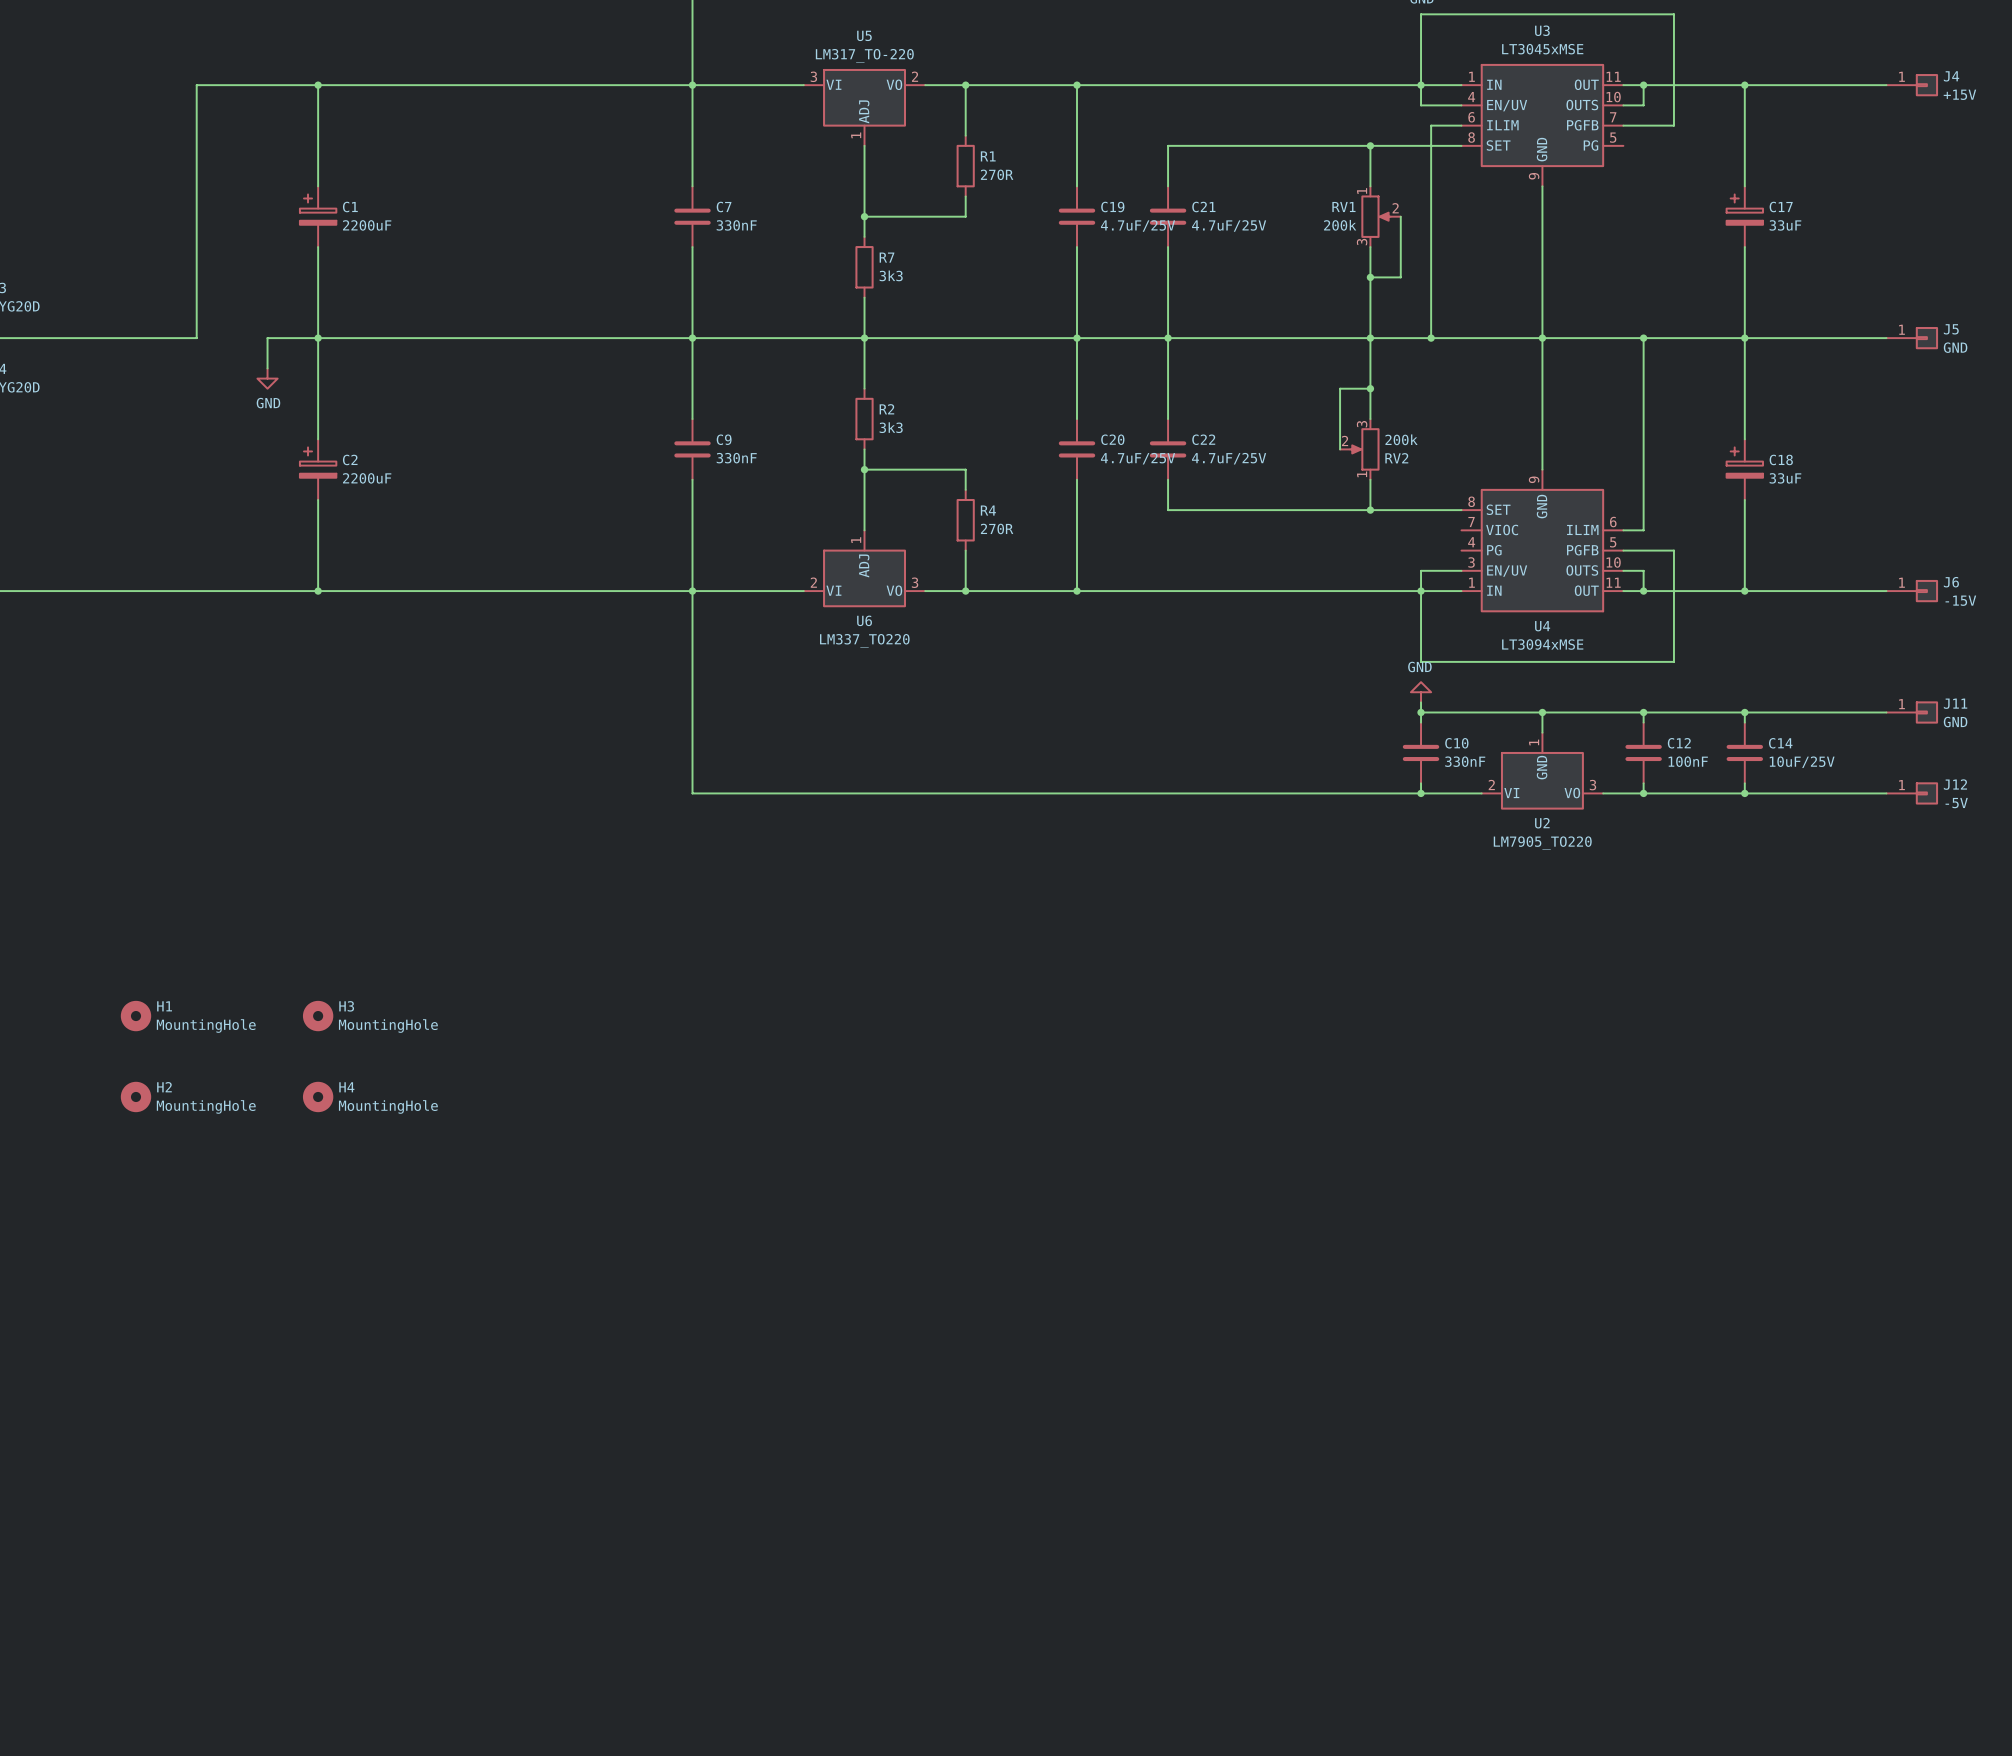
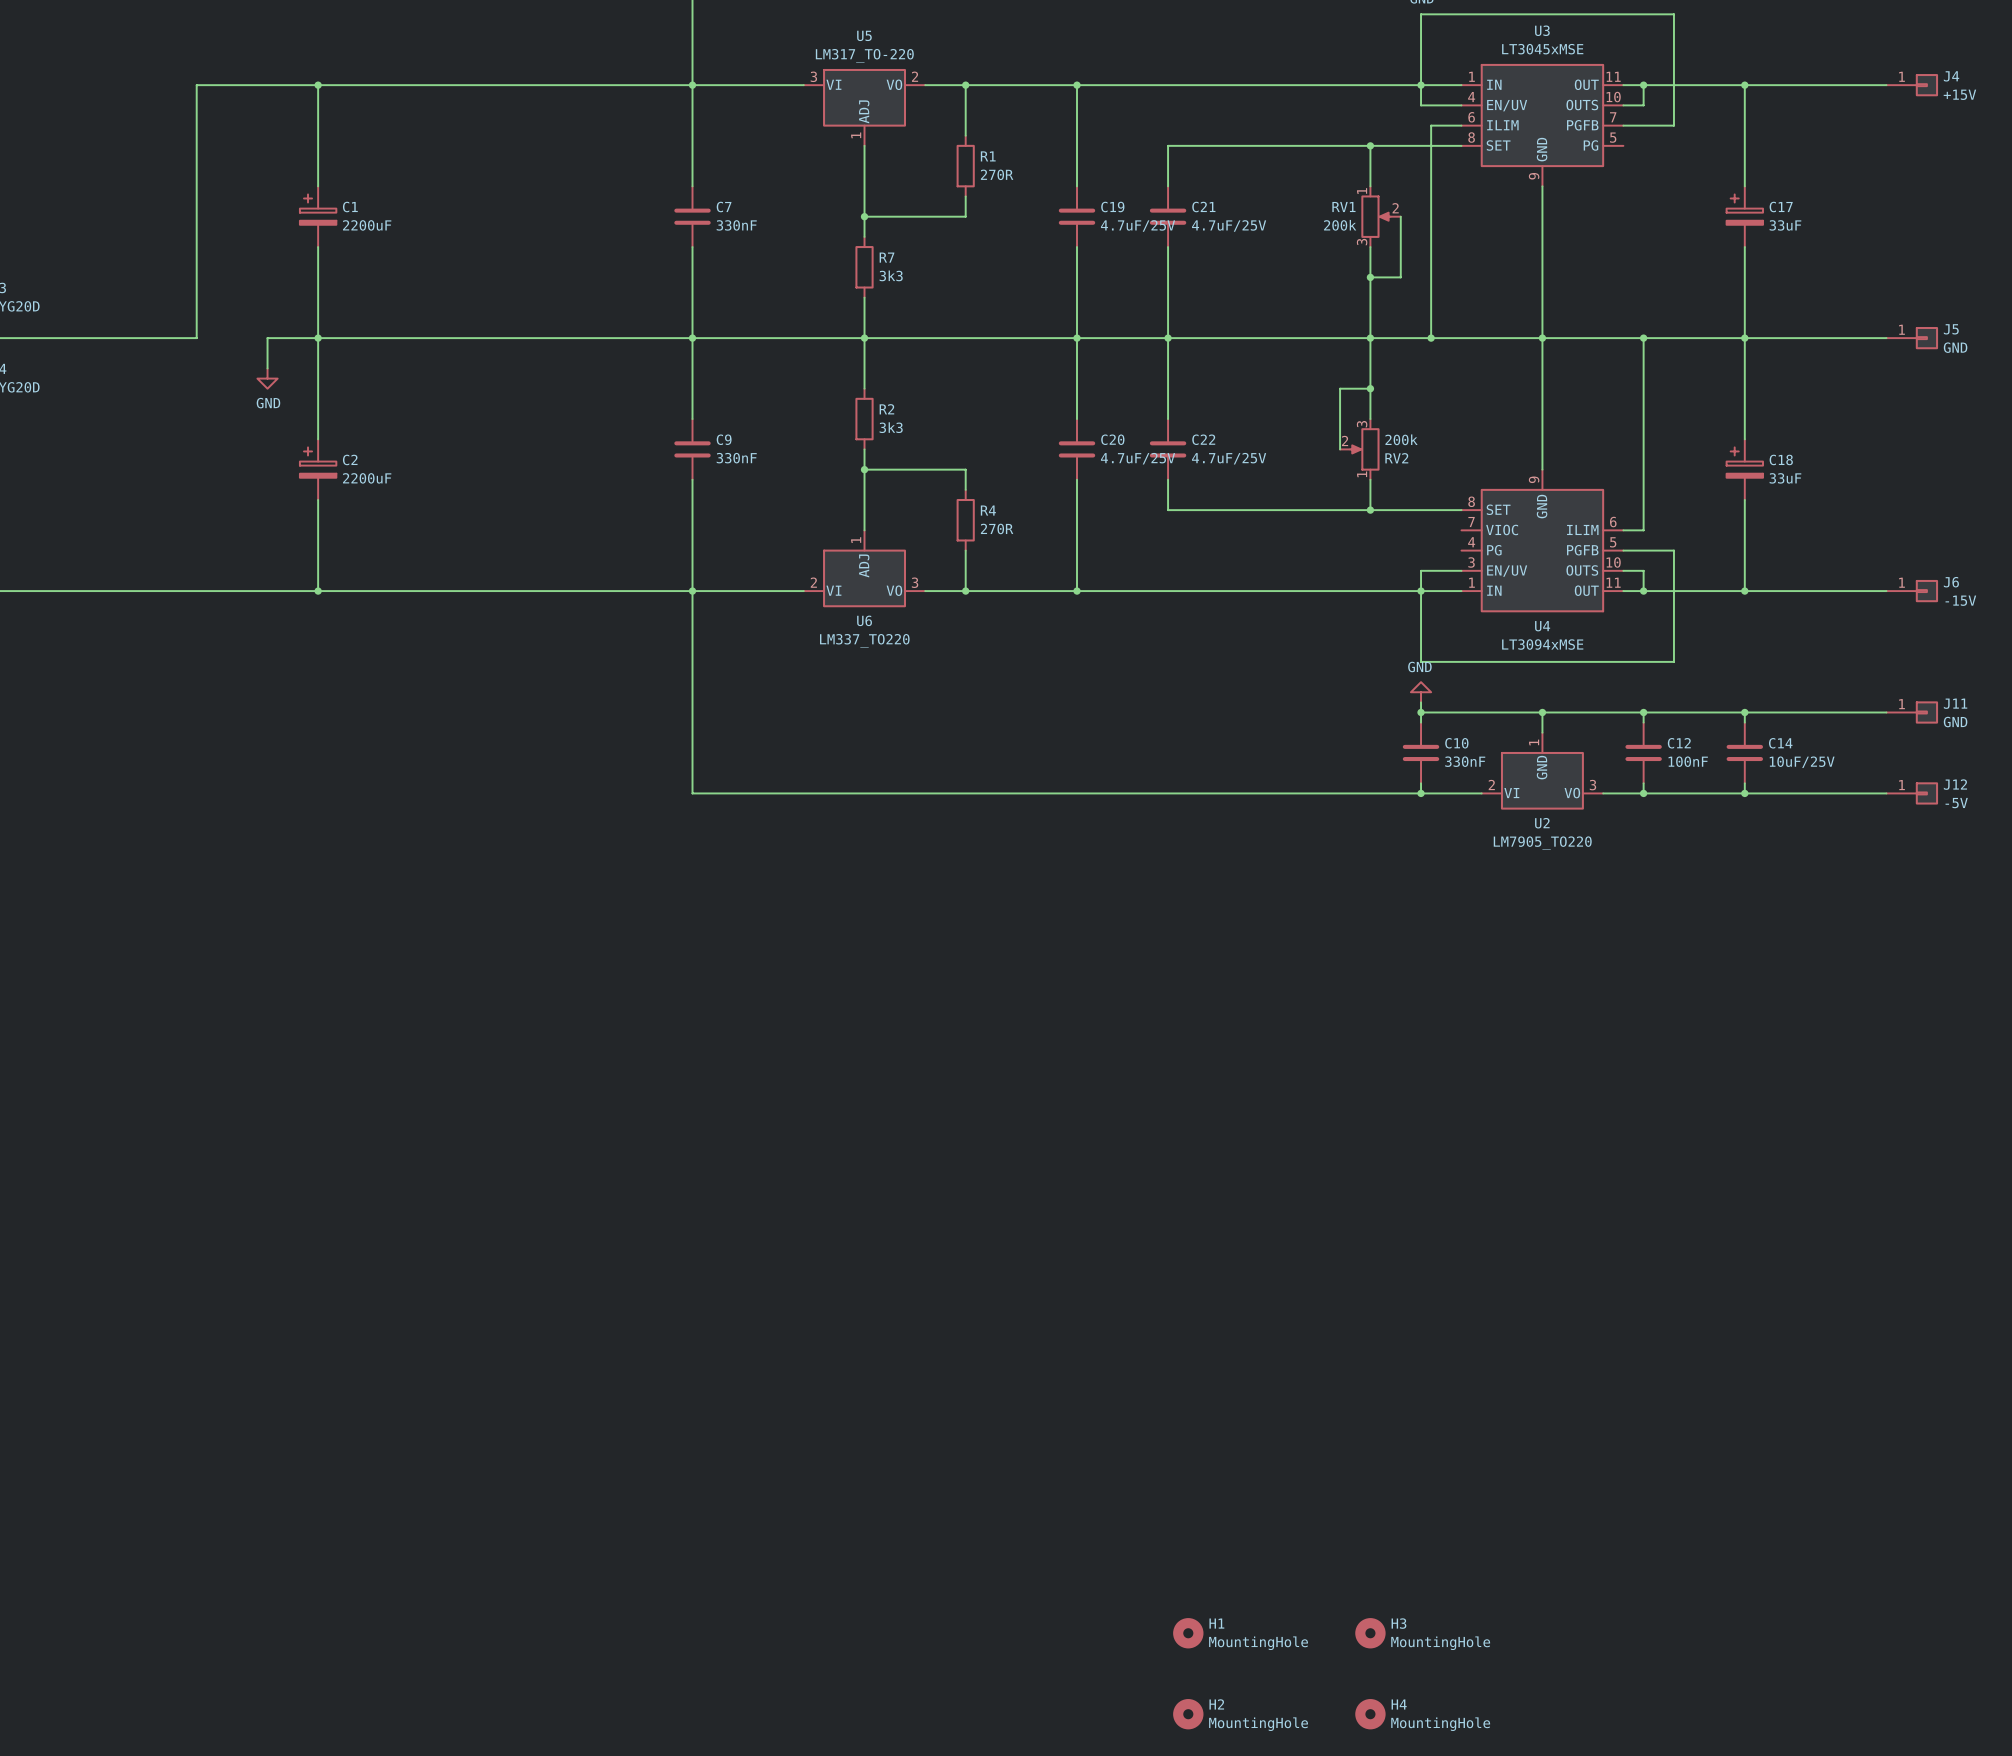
H1 position: (136, 1016) -> (1188, 1633)
H3 position: (318, 1016) -> (1370, 1633)
H2 position: (136, 1096) -> (1188, 1714)
H4 position: (318, 1096) -> (1370, 1714)

